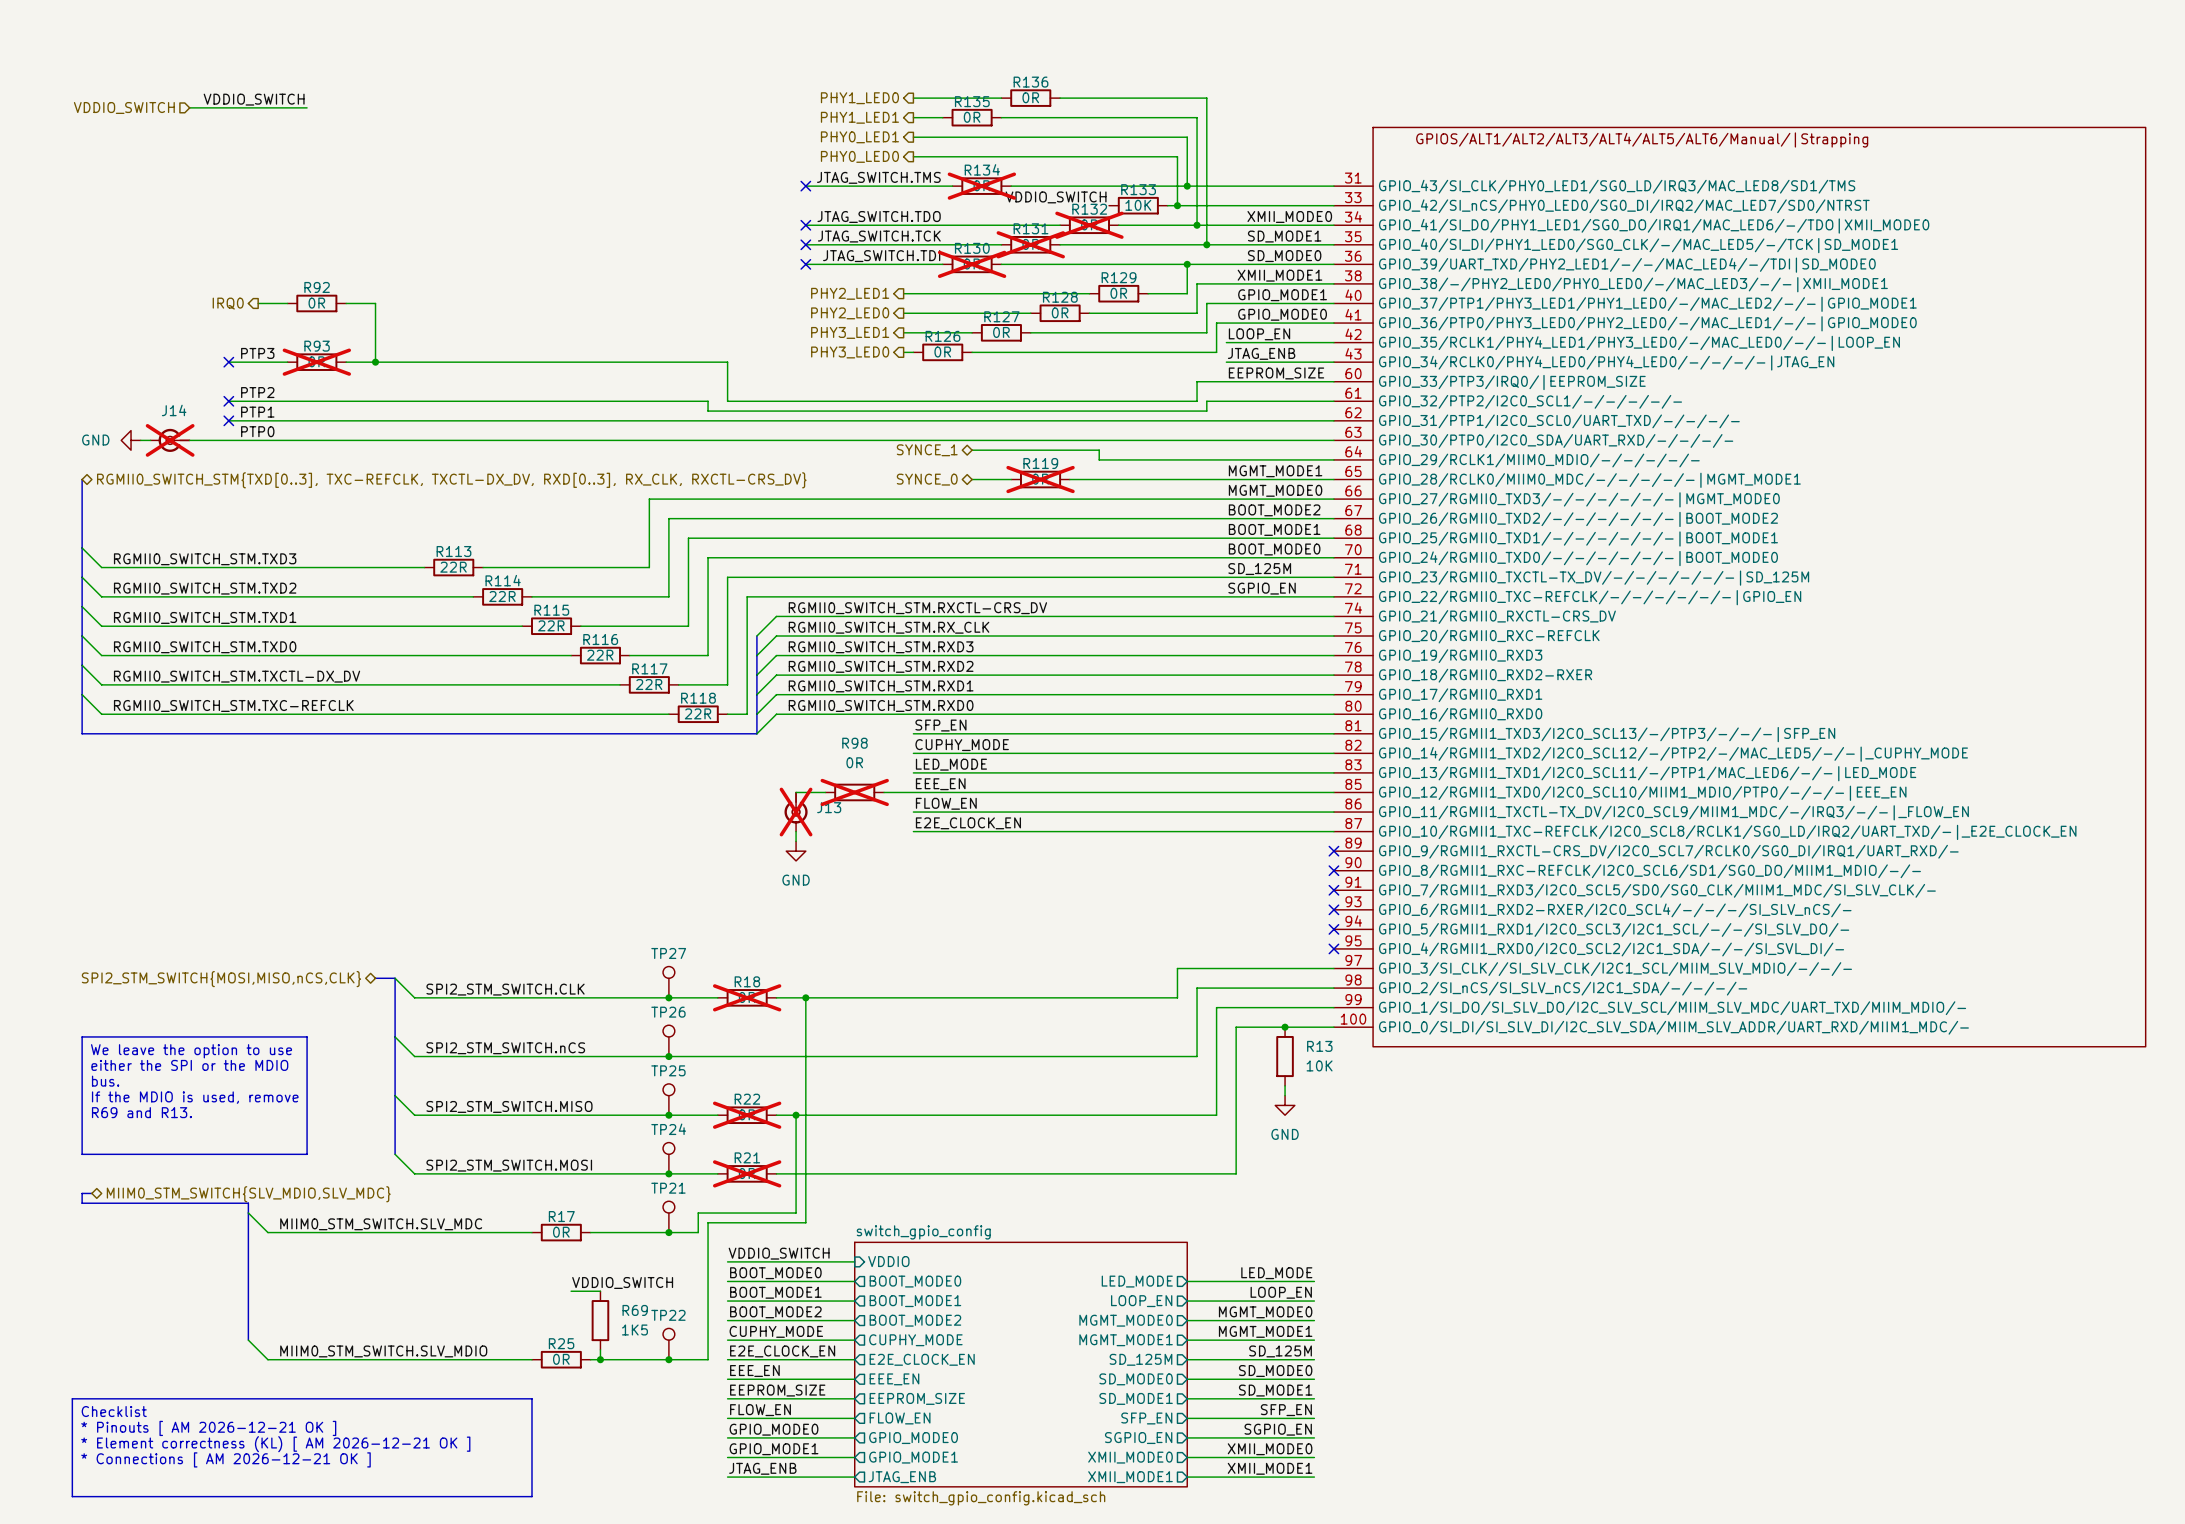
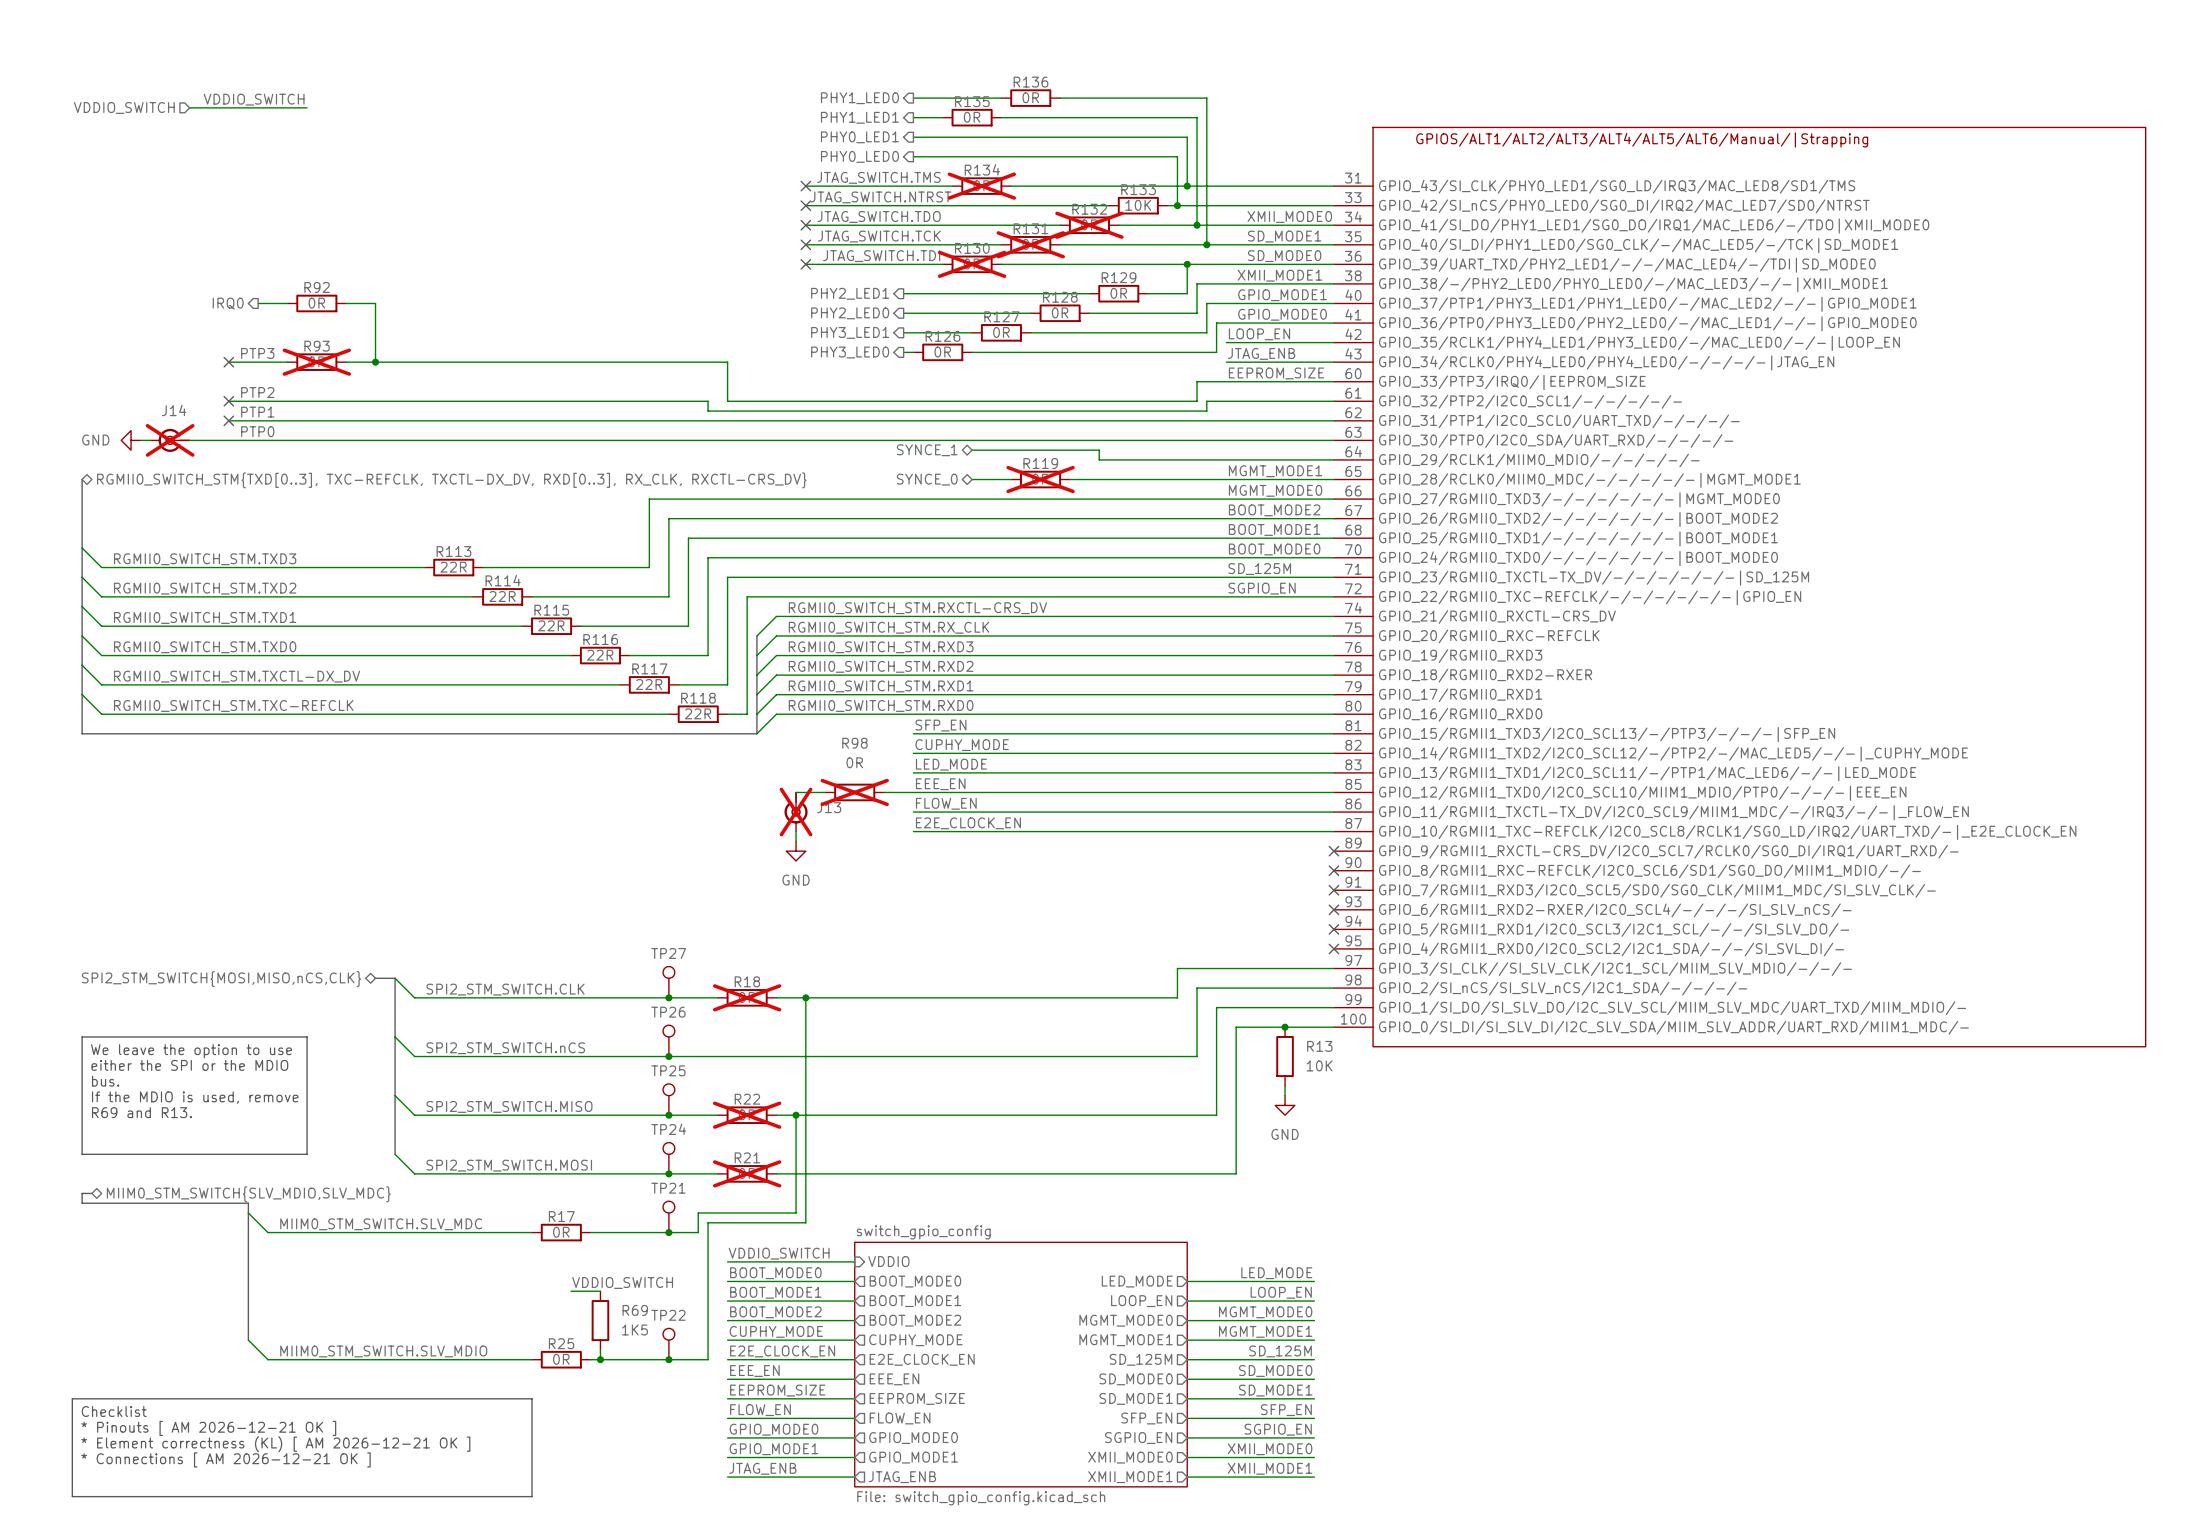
label: none -> JTAG_SWITCH.NTRST (880, 197)
label: VDDIO_SWITCH (1056, 197) -> none
wire: none -> (805, 205) (1109, 205)
no-connect mark: none -> (805, 205)

